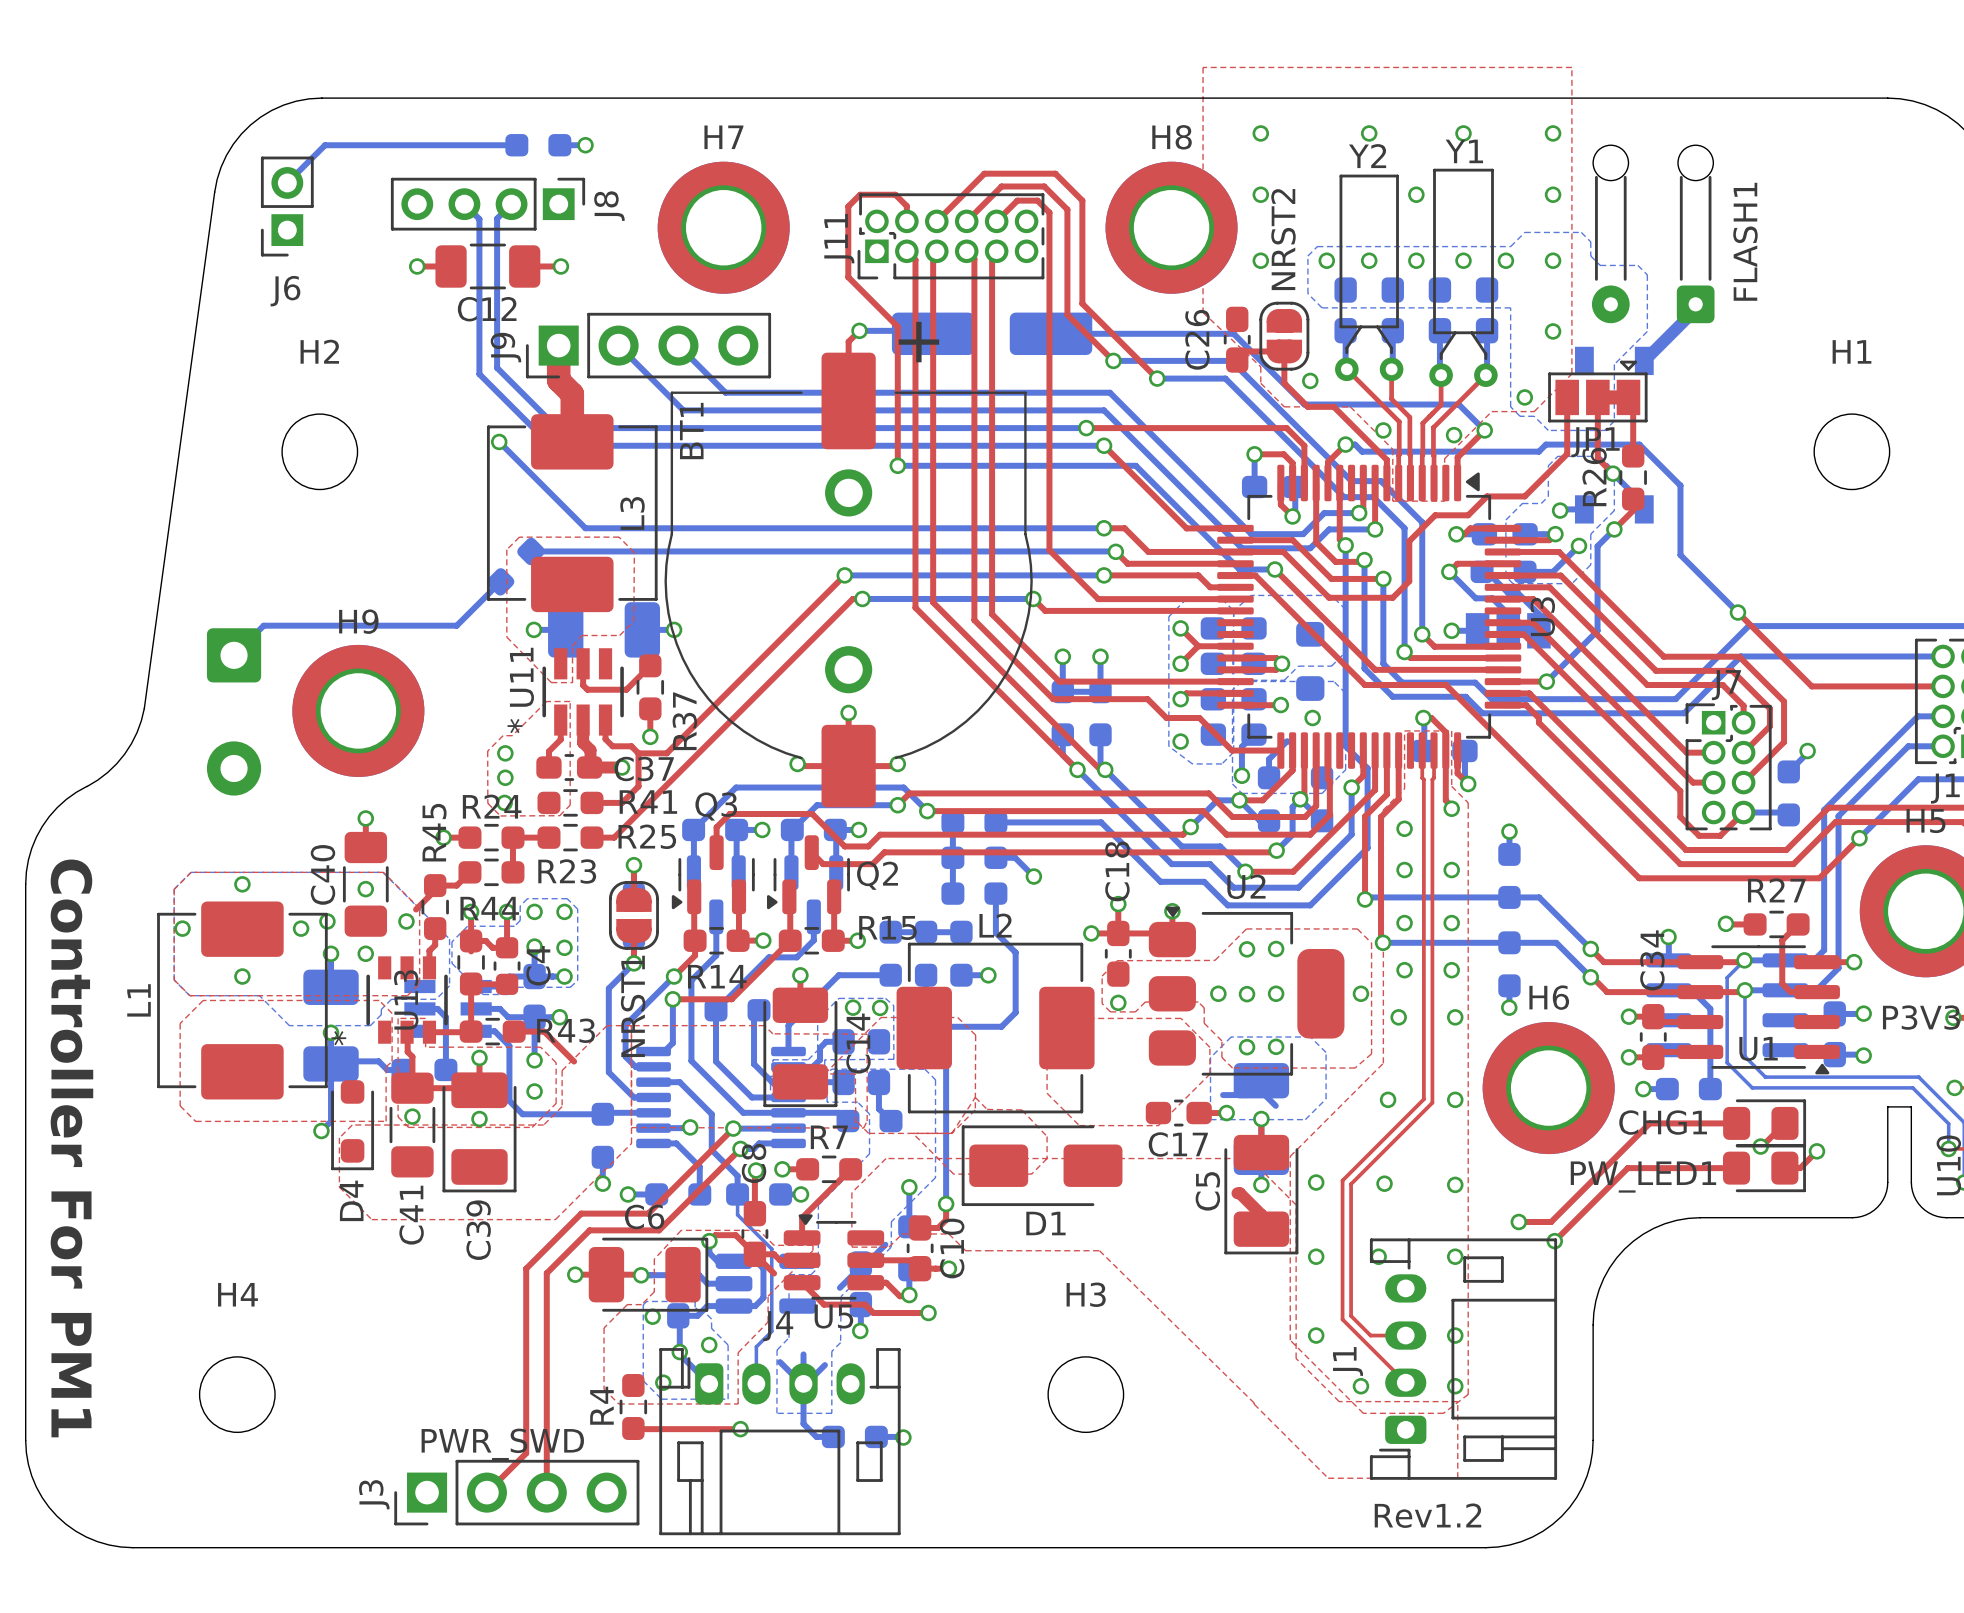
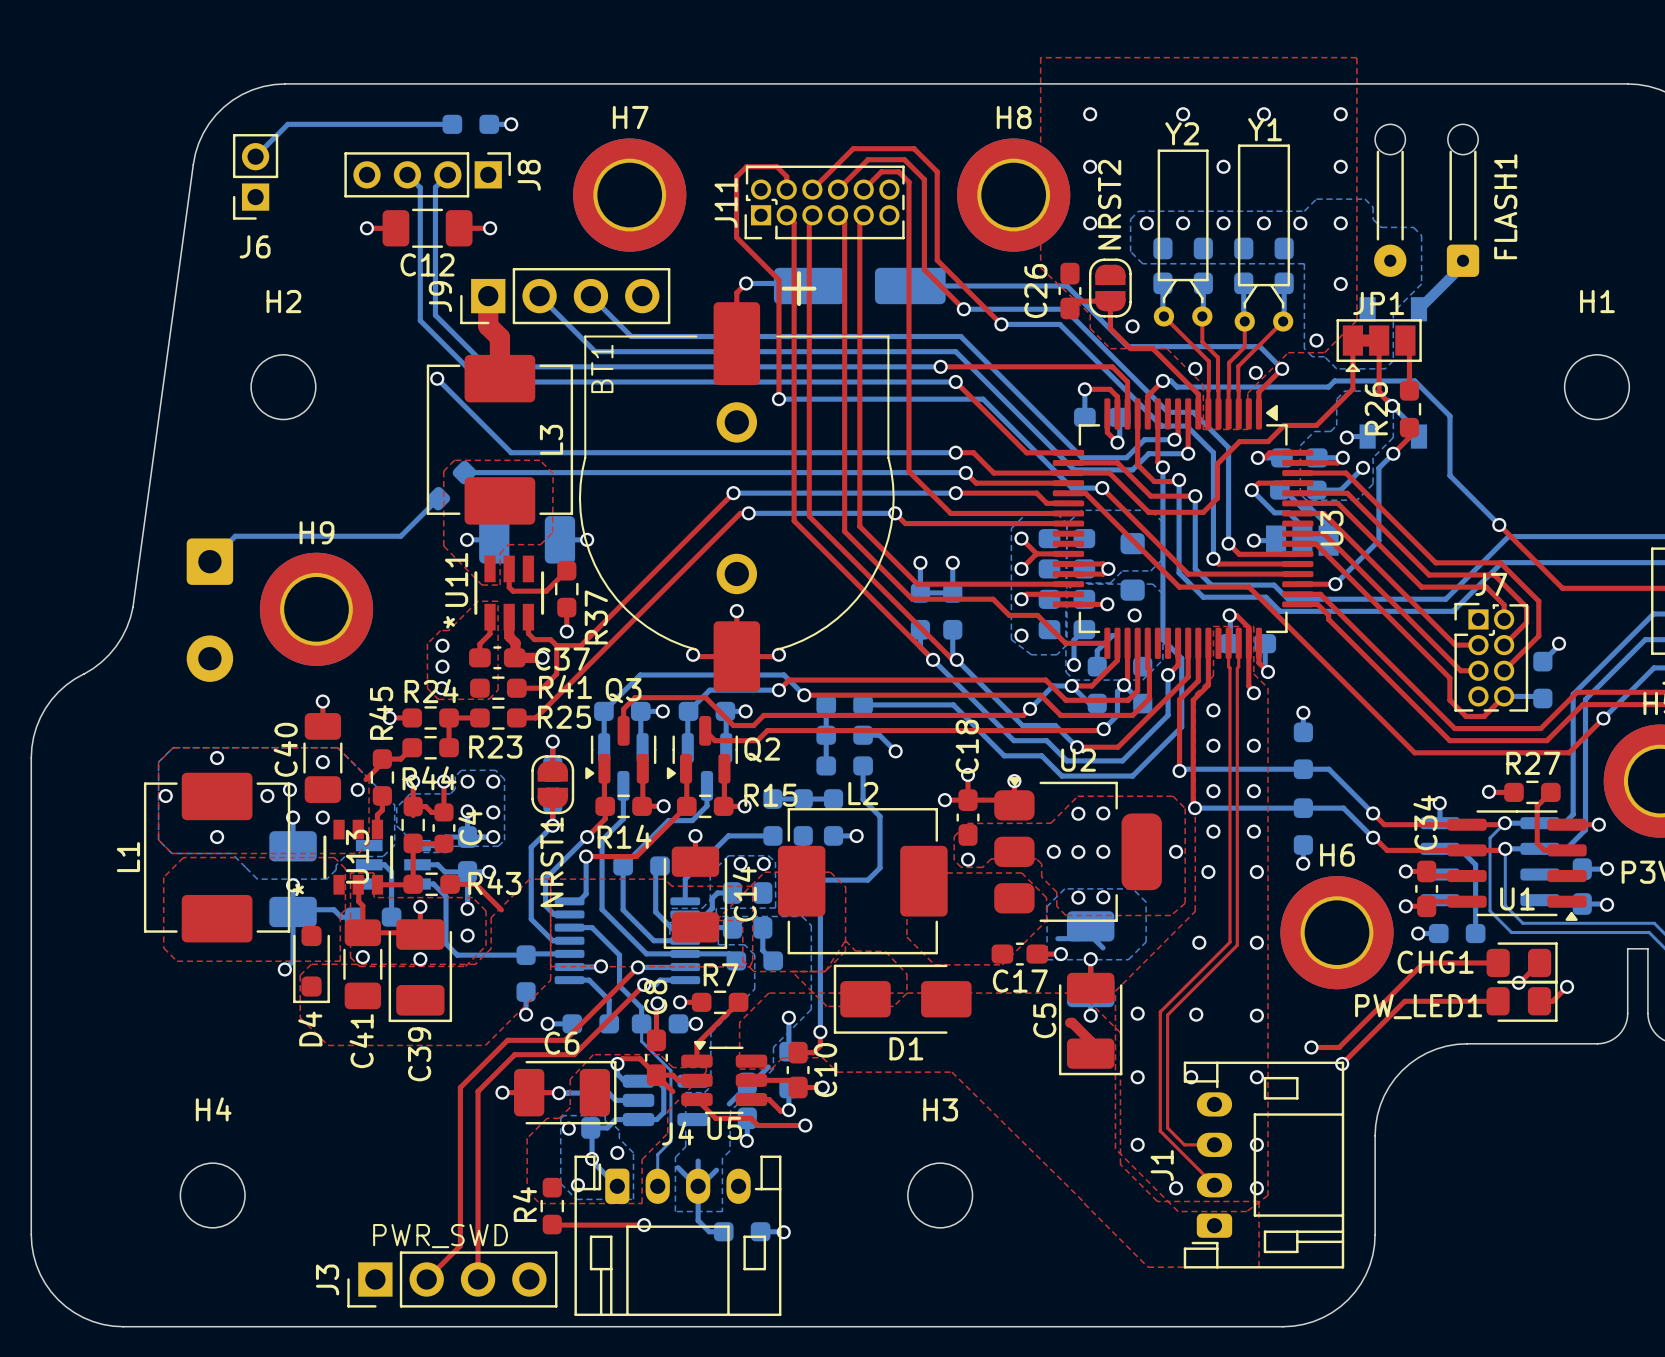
JP1 rotation: 0° (1597, 391) -> 180° (1379, 345)
text: Controller For PM1 (71, 1148) -> none
text: Rev1.2 (1427, 1515) -> none

